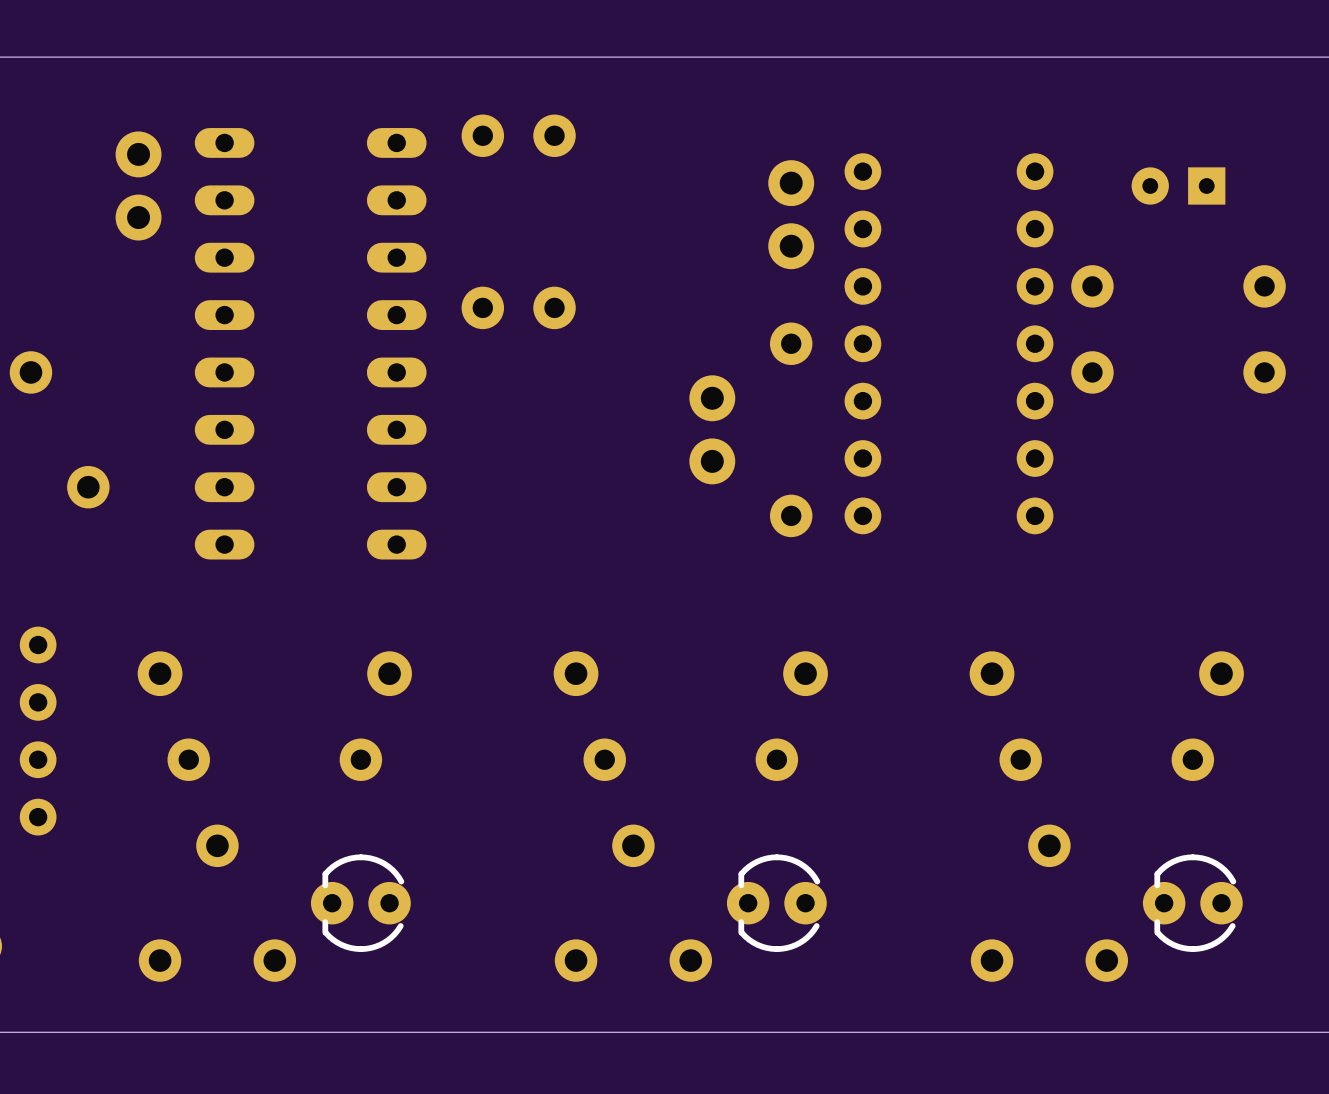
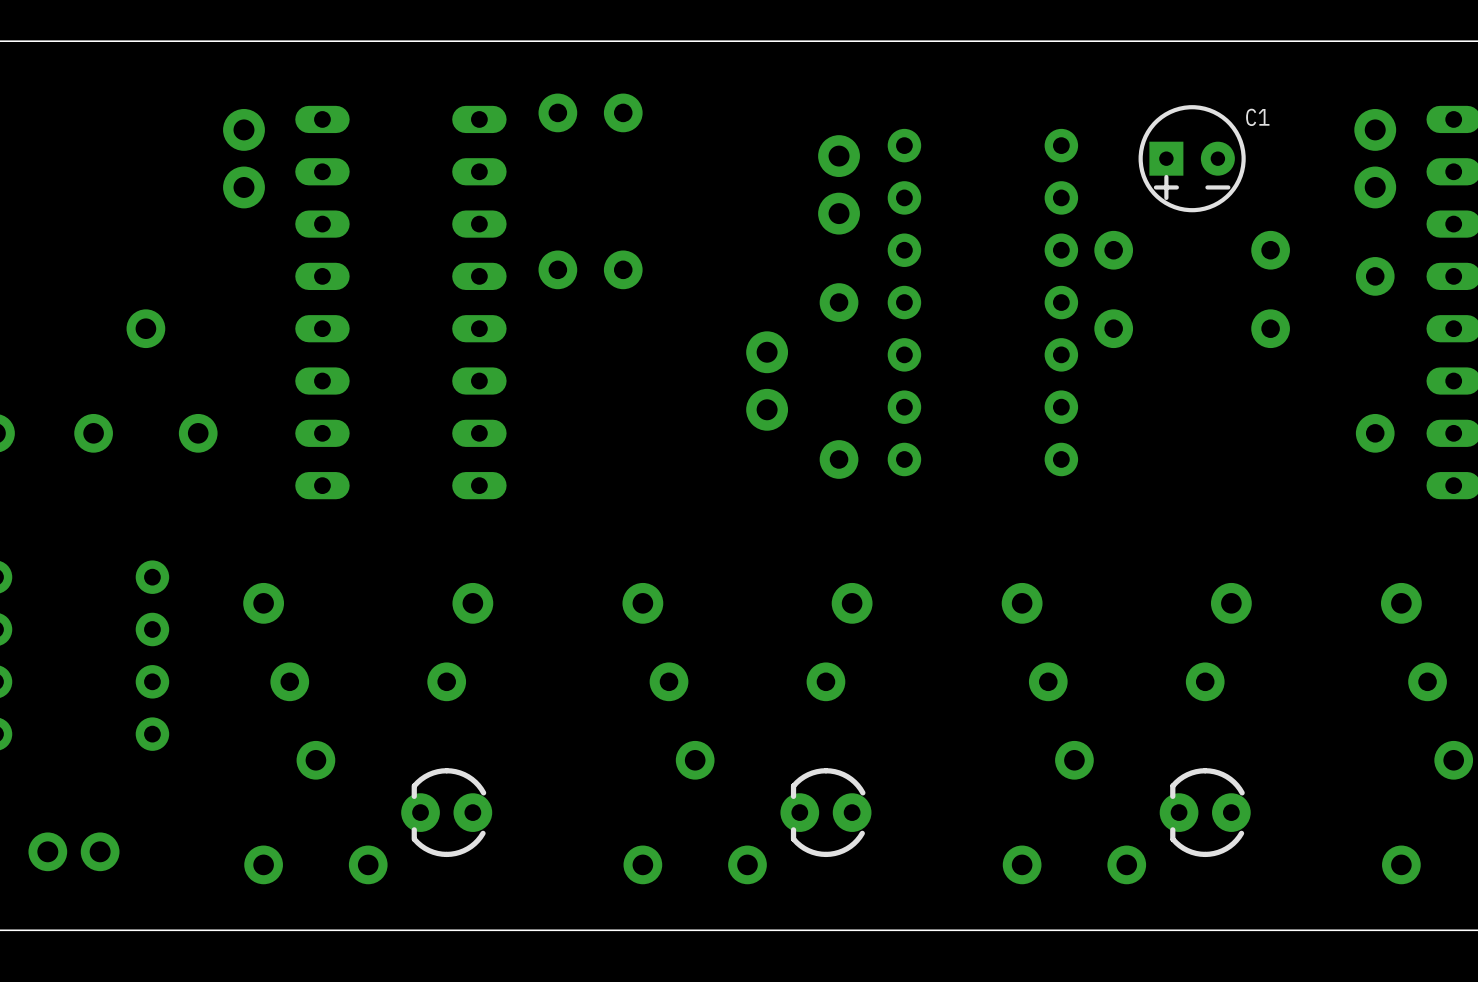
C1 side: top (1178, 185) -> bottom (1192, 158)

